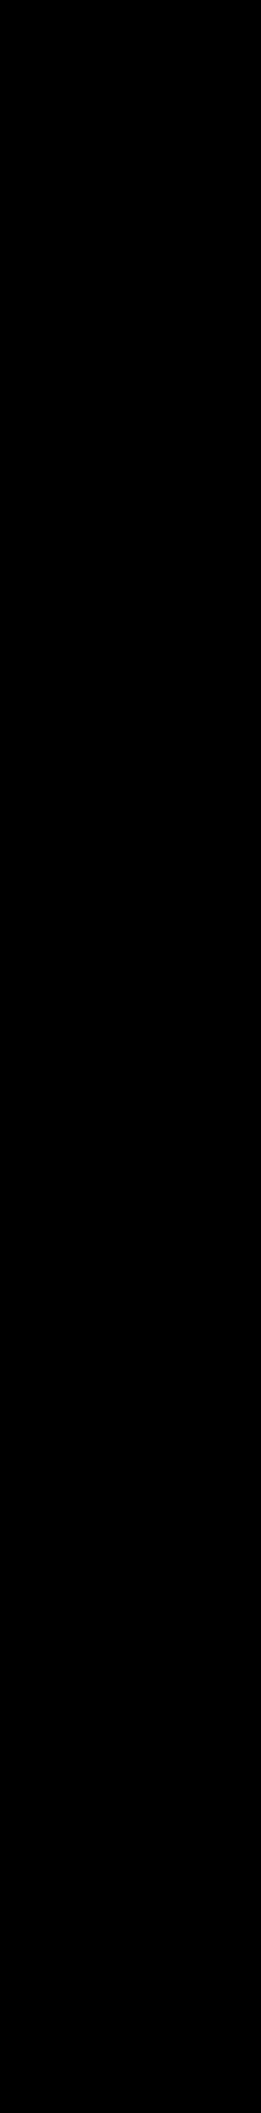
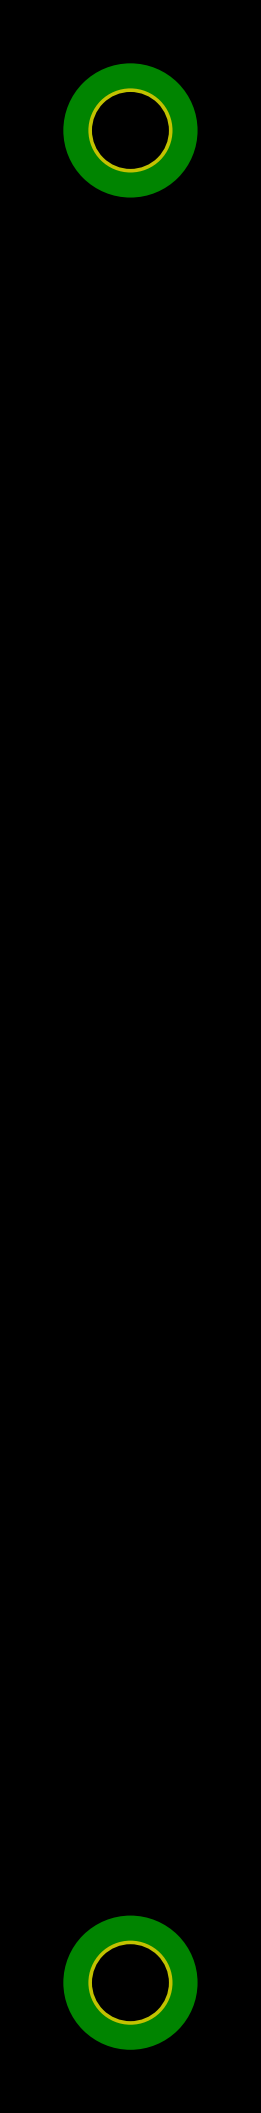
part: none -> (130, 130)
part: none -> (130, 1982)

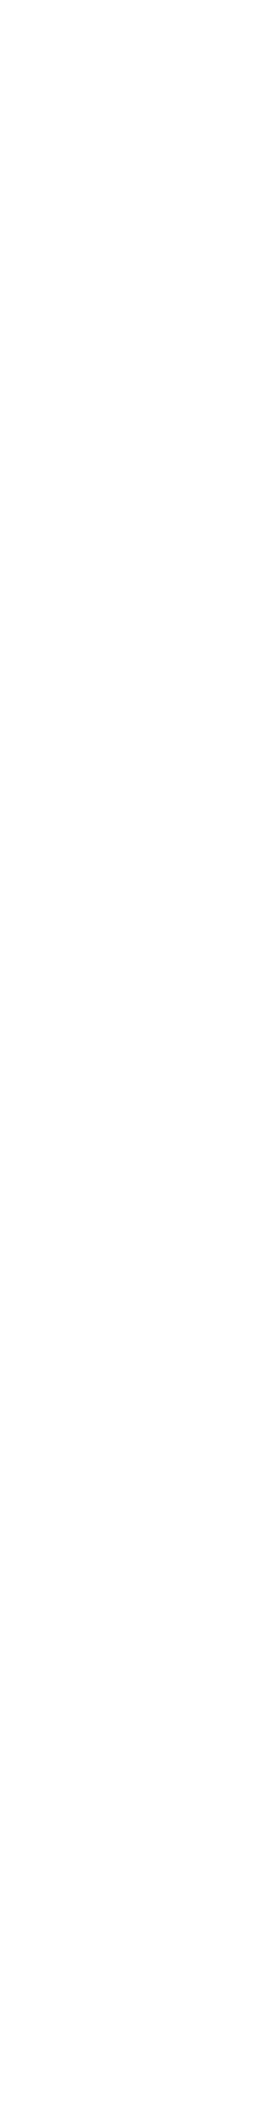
part: (130, 130) -> none
part: (130, 1982) -> none

